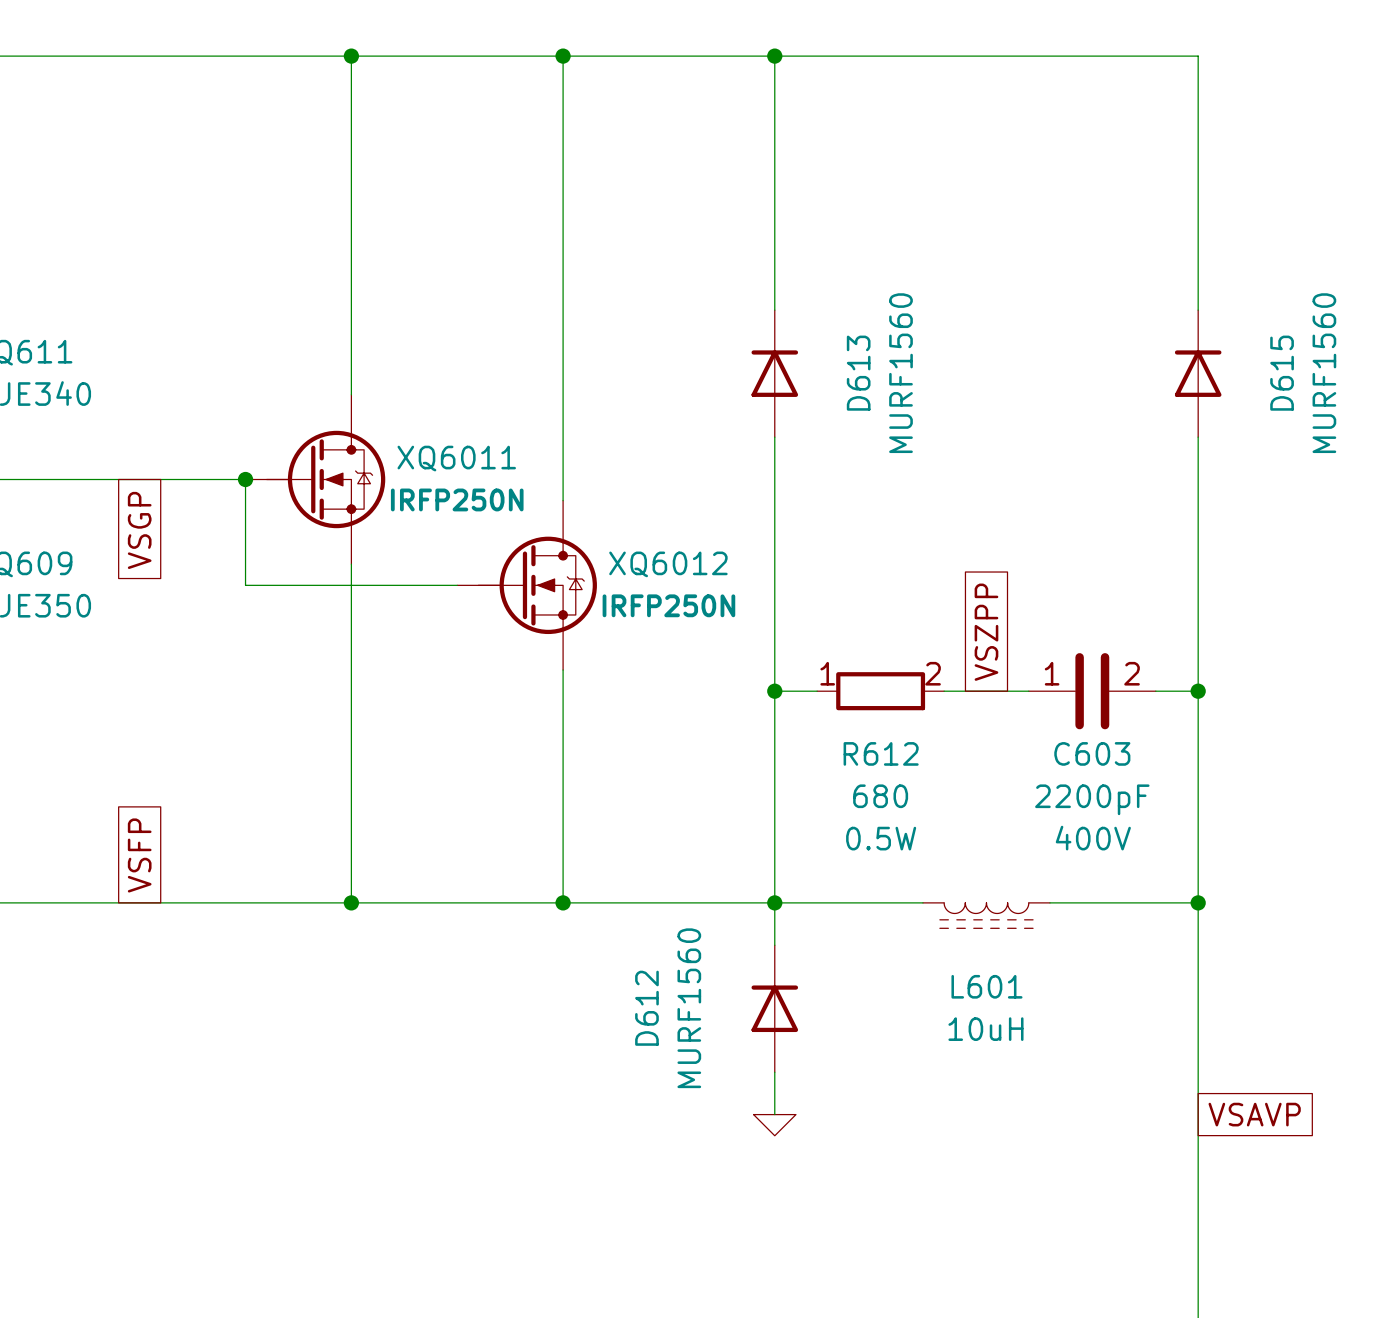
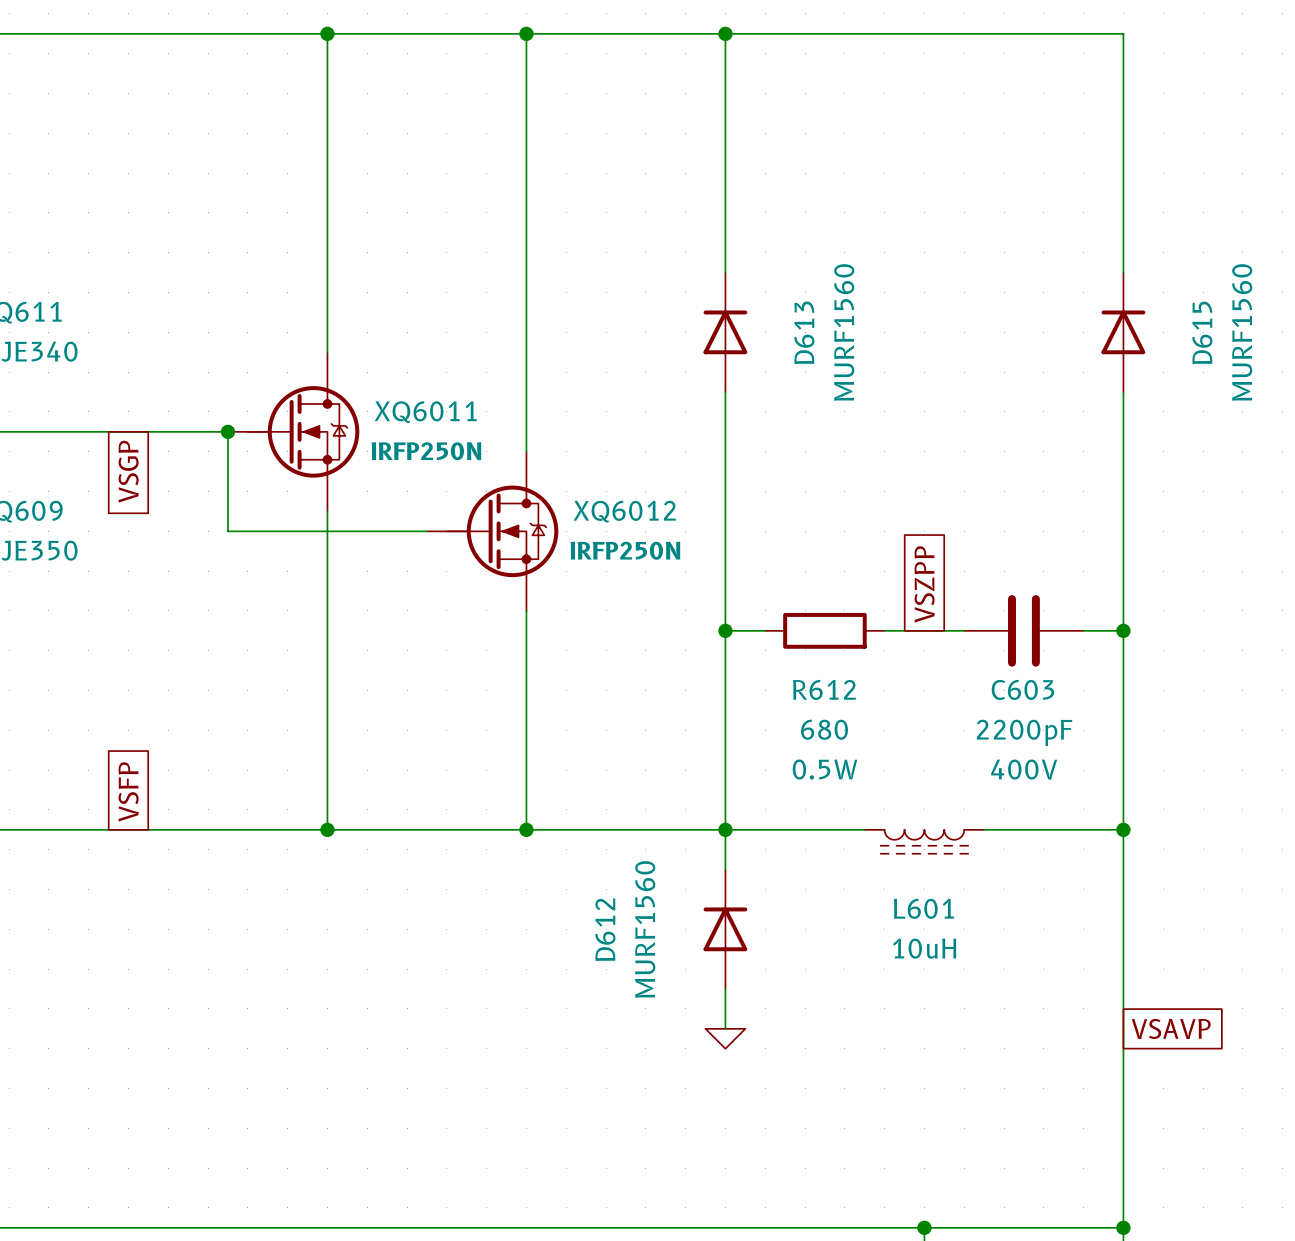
R612 pin number: 1 (827, 673) -> none
R612 pin number: 2 (933, 673) -> none
C603 pin number: 1 (1052, 673) -> none
C603 pin number: 2 (1132, 673) -> none

